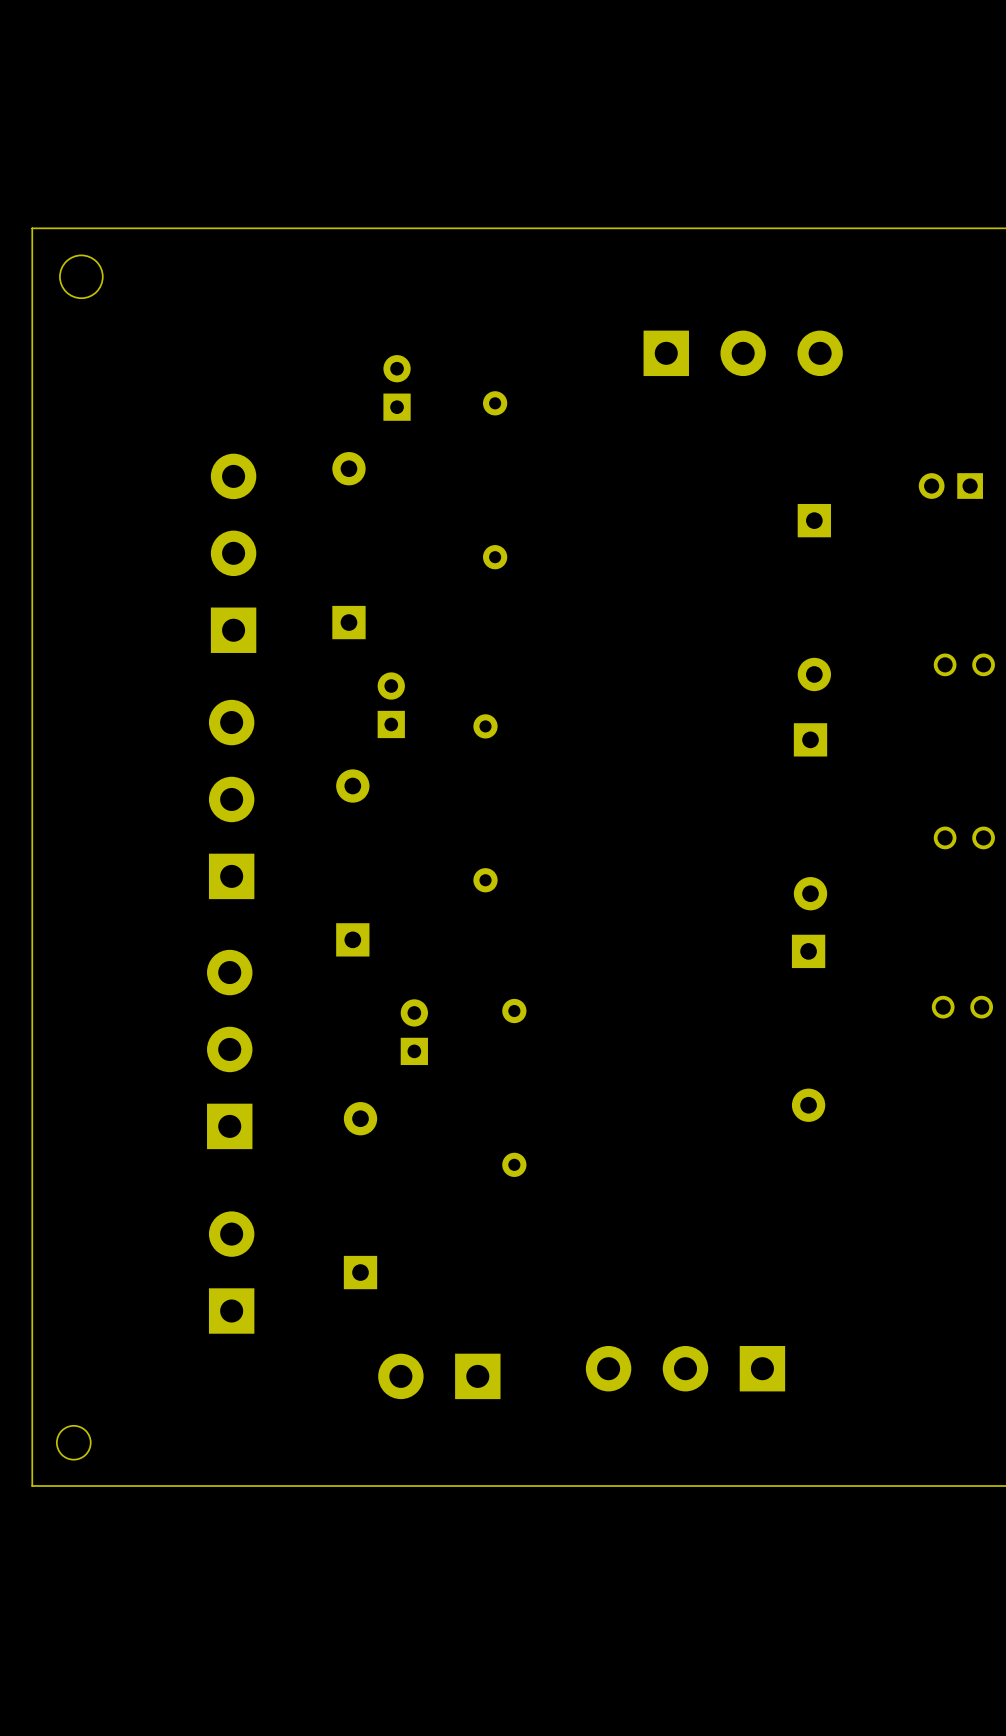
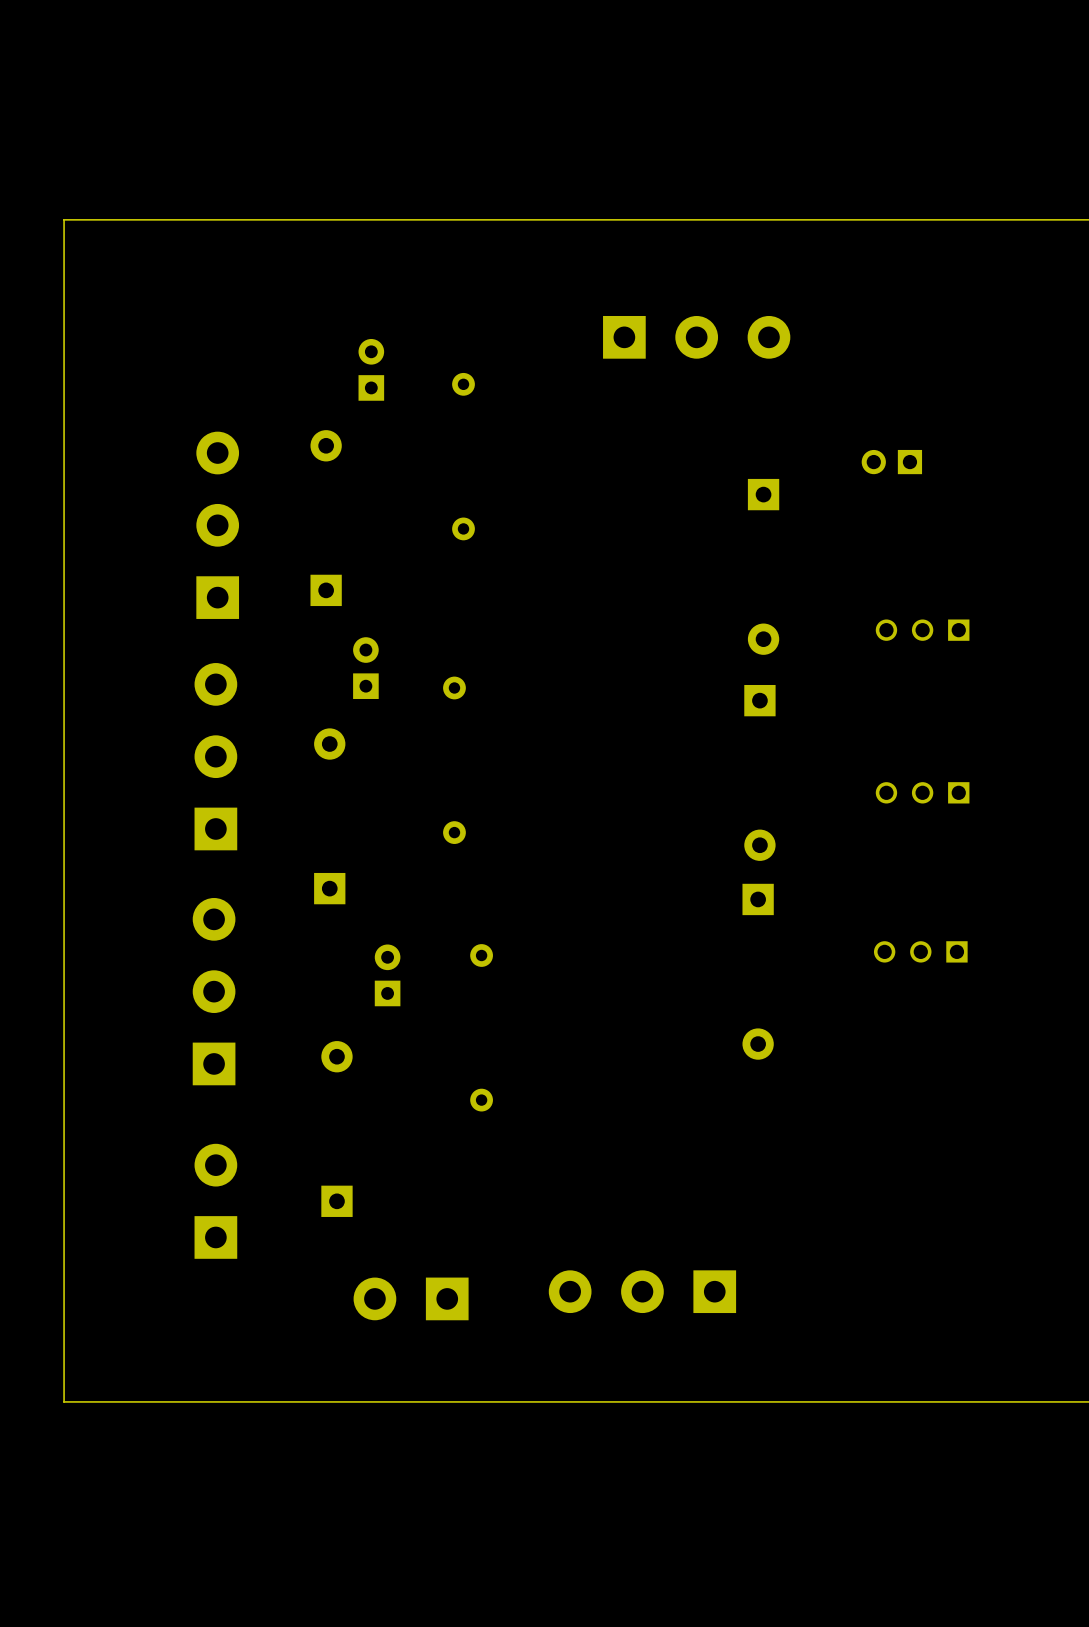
board edge: (70, 228) (32, 228) (32, 1486) (70, 1486) -> (64, 219) (64, 1401)
round board edge: [59, 254, 104, 299] -> none
round board edge: [56, 1425, 92, 1461] -> none

